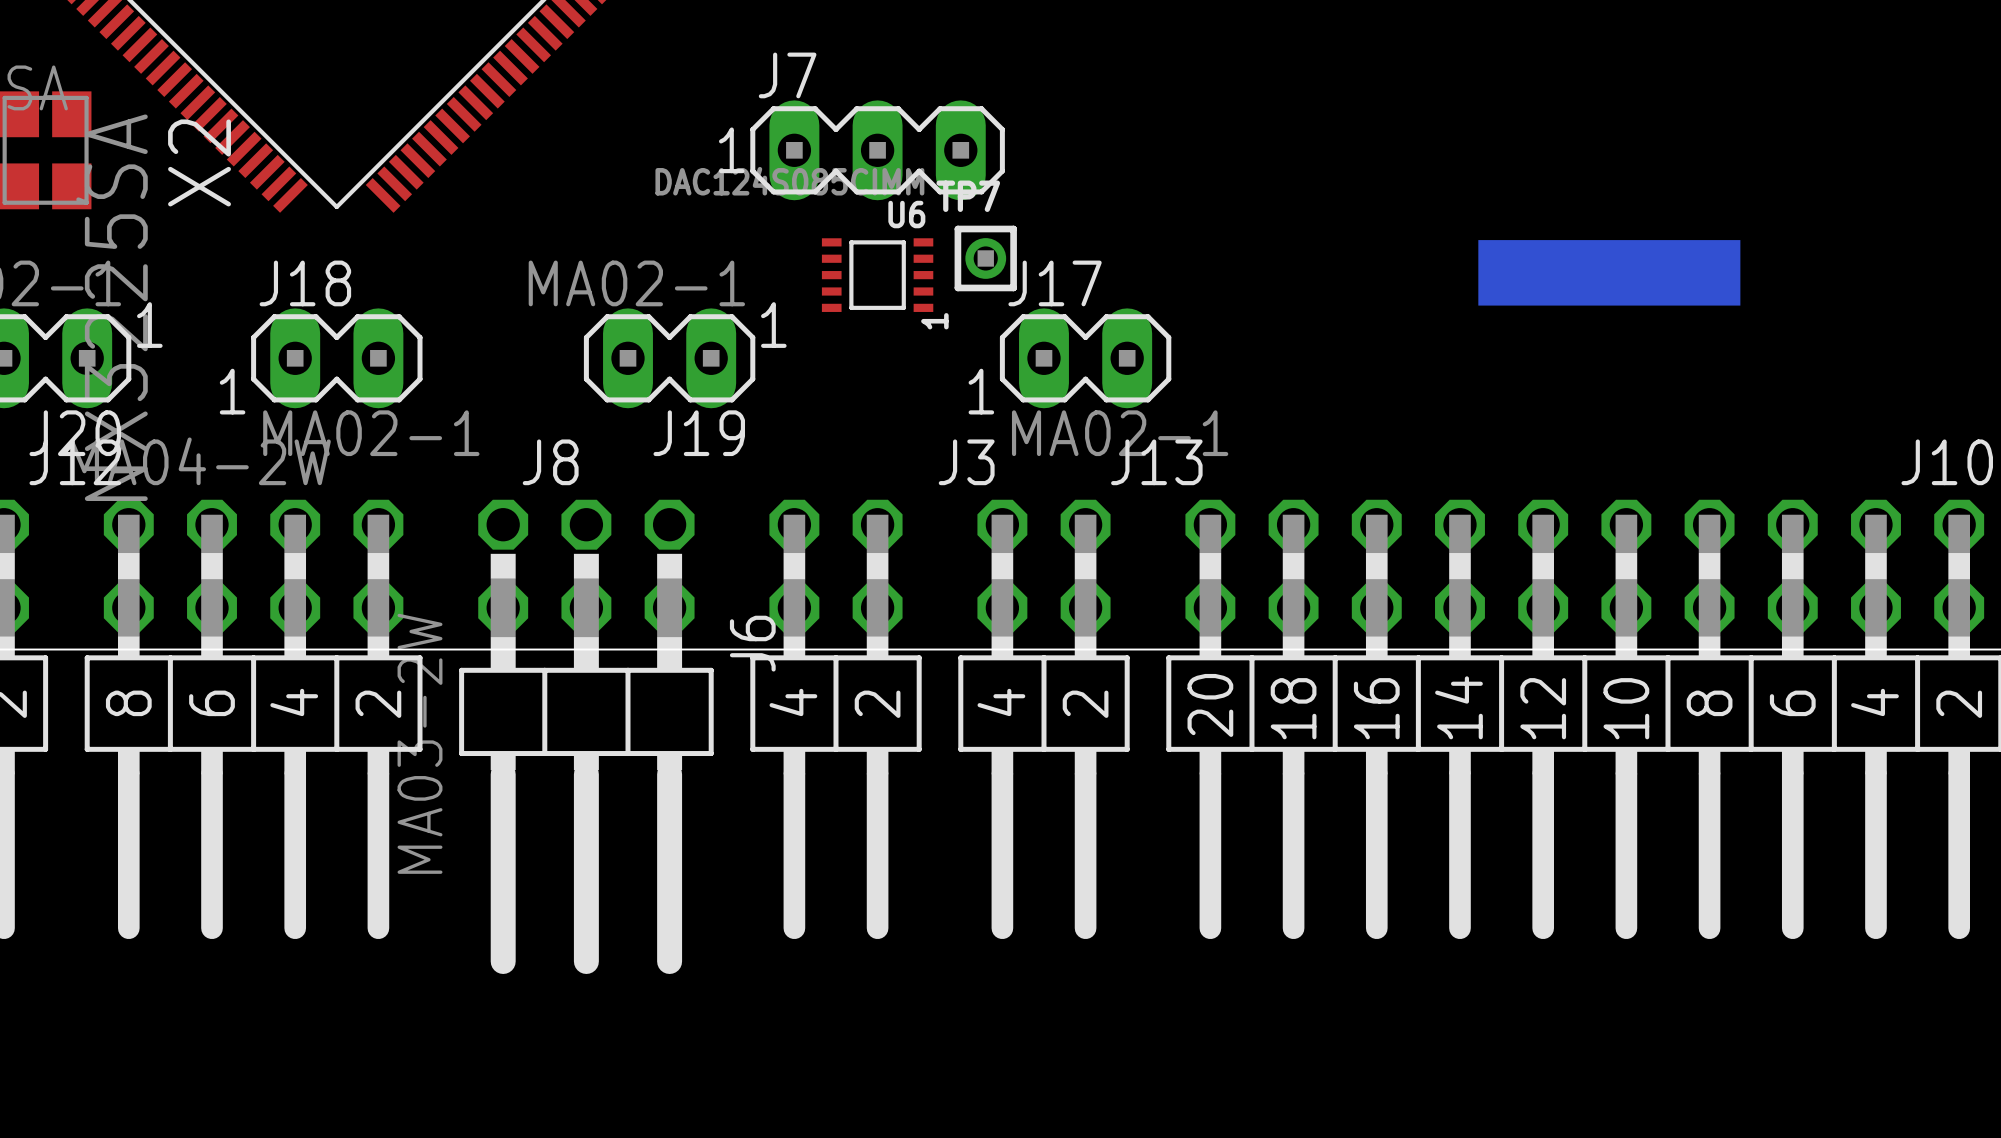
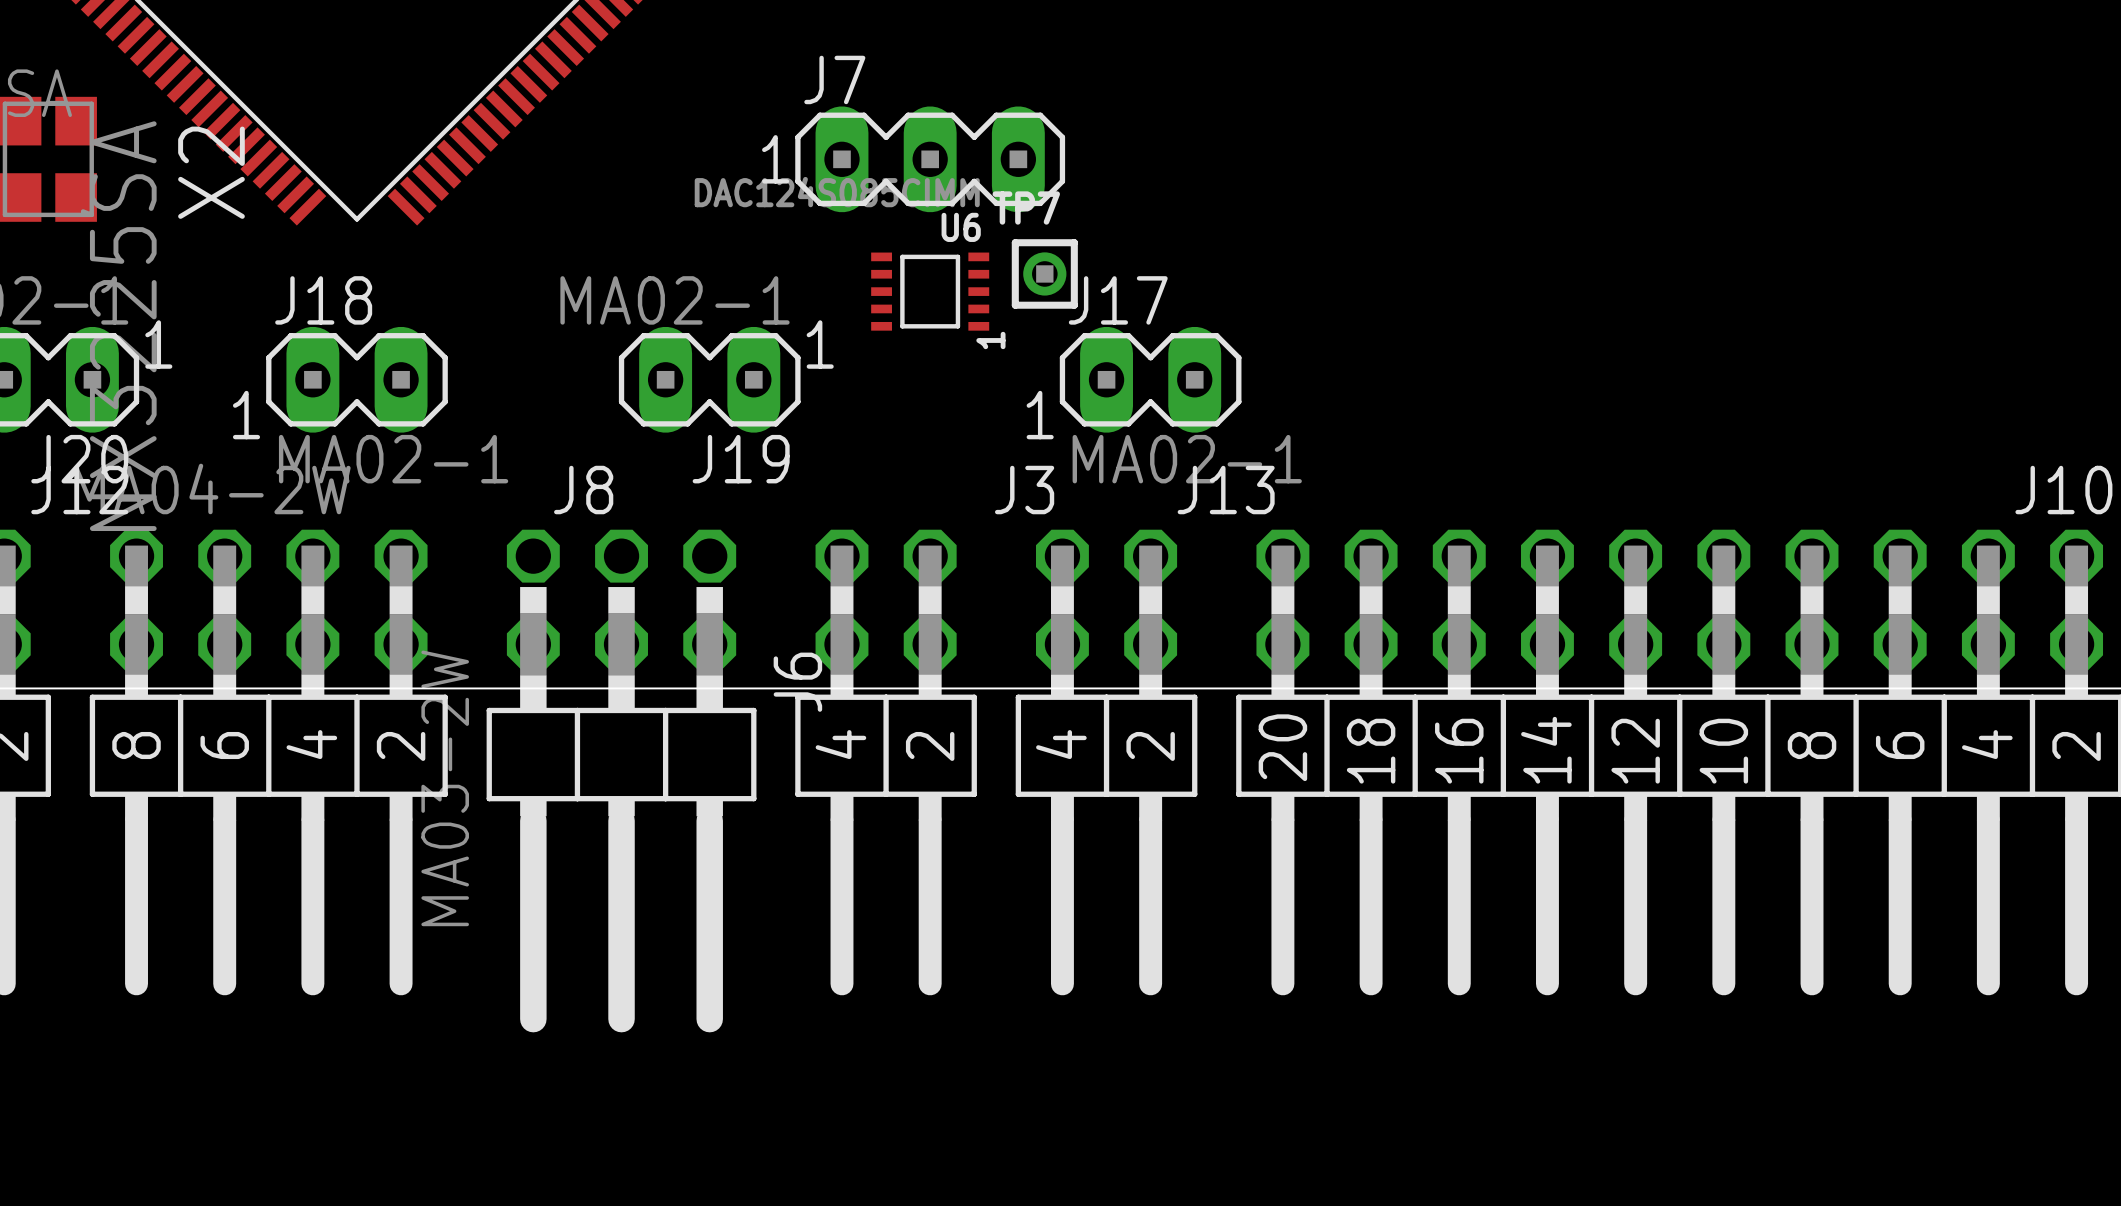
drawing: [1478, 240, 1741, 306] -> none

